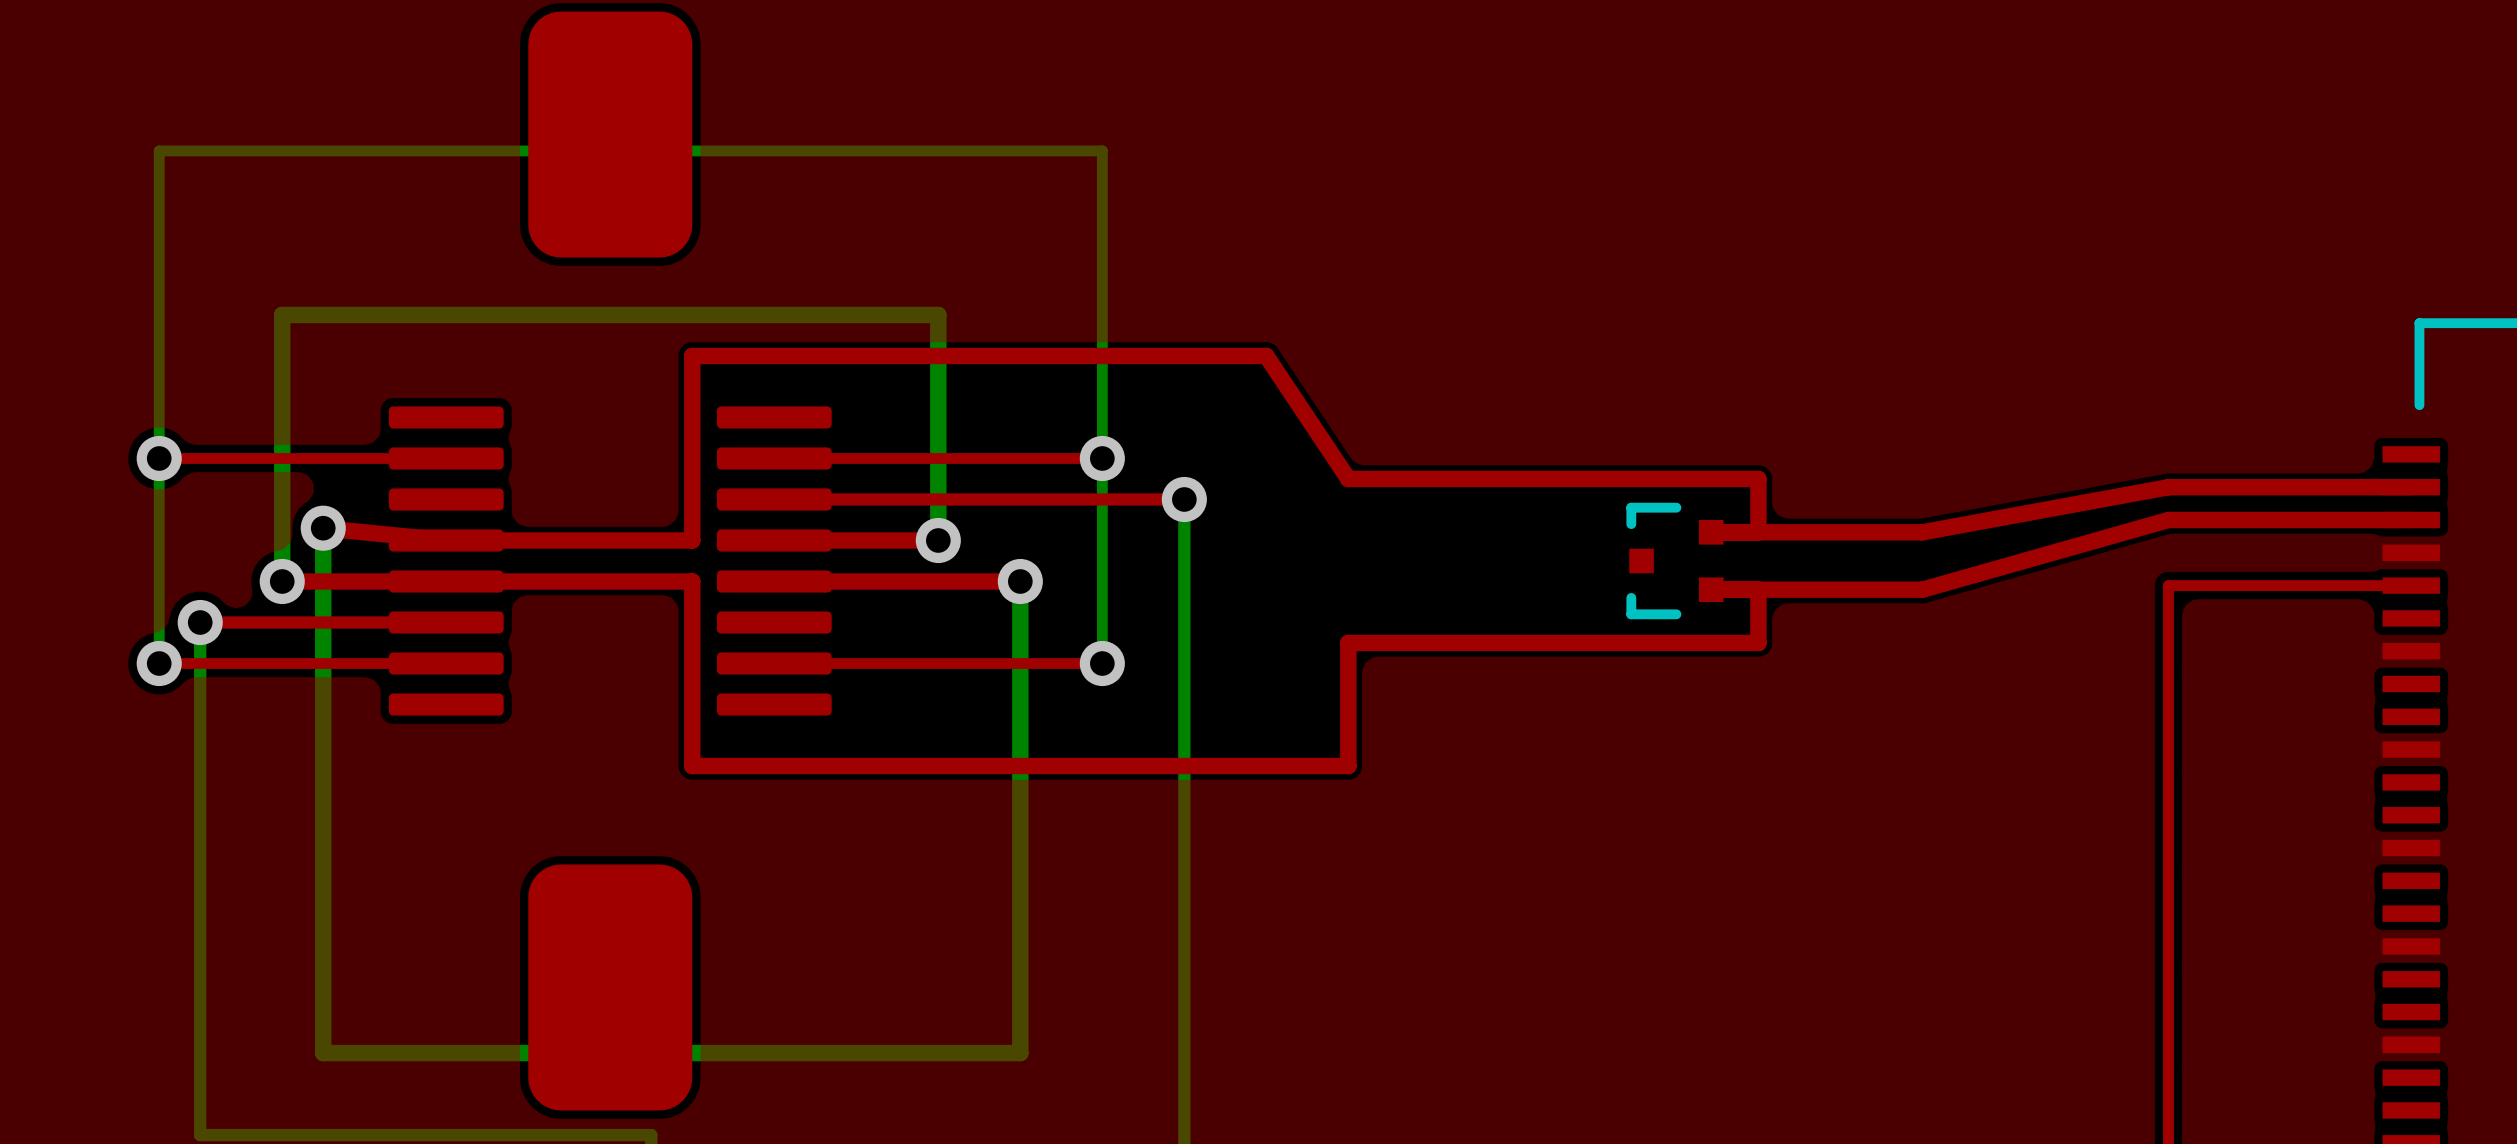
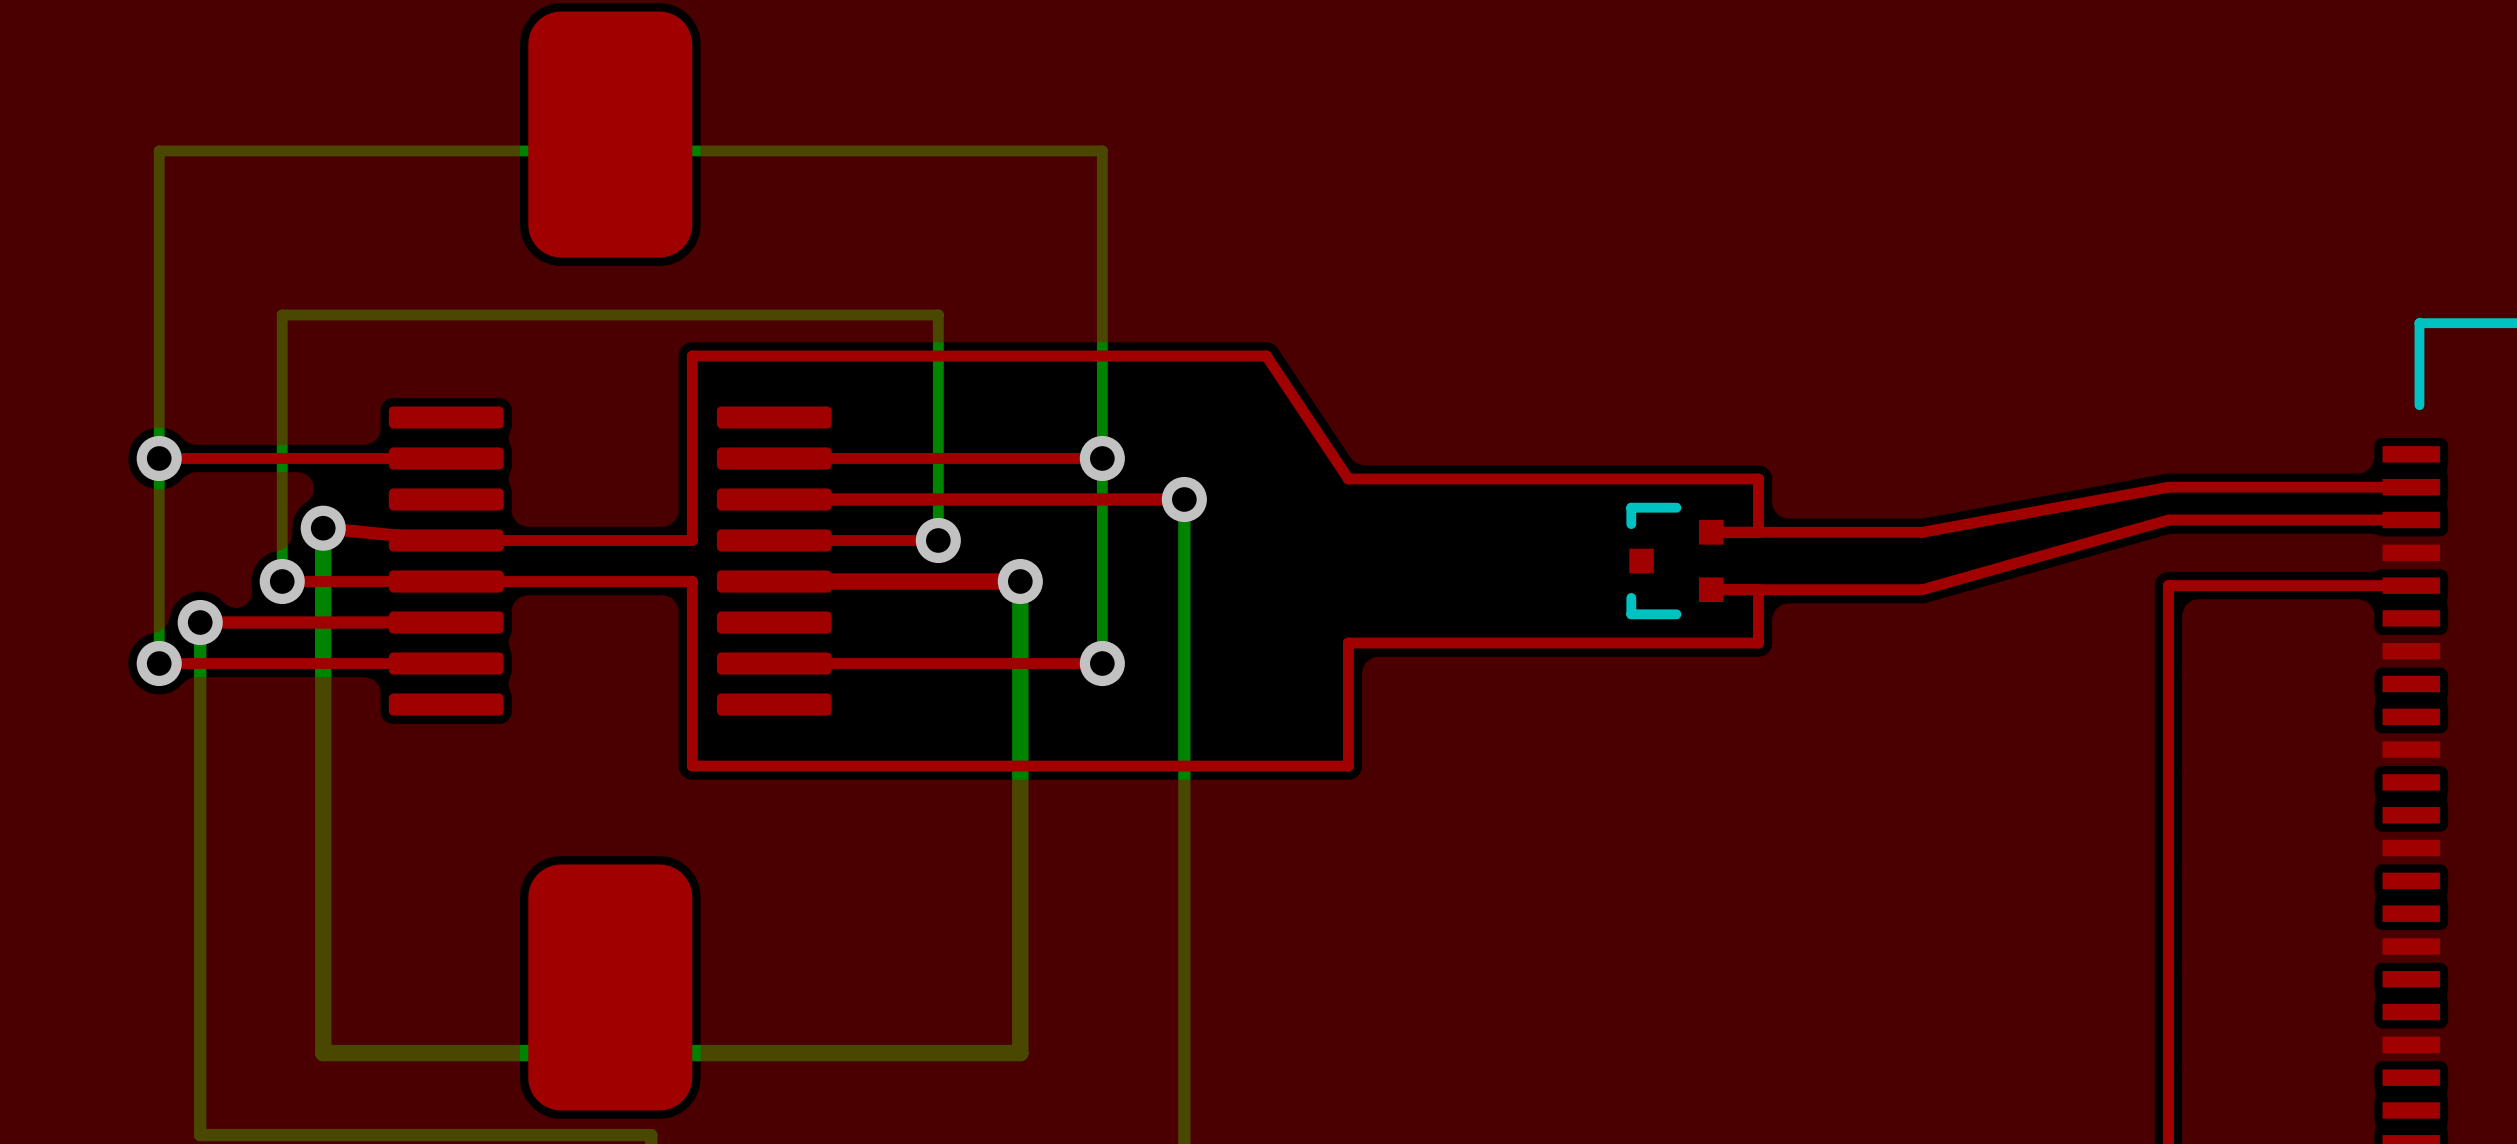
top track width: thick (2411, 487) (2168, 487) (1922, 532) (1711, 532) -> thin (2411, 487) (2168, 487) (1922, 532) (1711, 532)
top track width: thick (2411, 520) (2168, 520) (1922, 589) (1711, 589) -> thin (2411, 520) (2168, 520) (1922, 589) (1711, 589)
top track width: thick (323, 528) (446, 540) (692, 540) (692, 355) (1266, 355) (1348, 478) (1758, 478) (1758, 532) -> thin (323, 528) (446, 540) (692, 540) (692, 355) (1266, 355) (1348, 478) (1758, 478) (1758, 532)
top track width: thick (774, 540) (938, 540) -> thin (774, 540) (938, 540)
bottom track width: thick (938, 540) (938, 314) (282, 314) (282, 581) -> thin (938, 540) (938, 314) (282, 314) (282, 581)
top track width: thick (282, 581) (692, 581) (692, 766) (1348, 766) (1348, 643) (1758, 643) (1758, 589) -> thin (282, 581) (692, 581) (692, 766) (1348, 766) (1348, 643) (1758, 643) (1758, 589)

